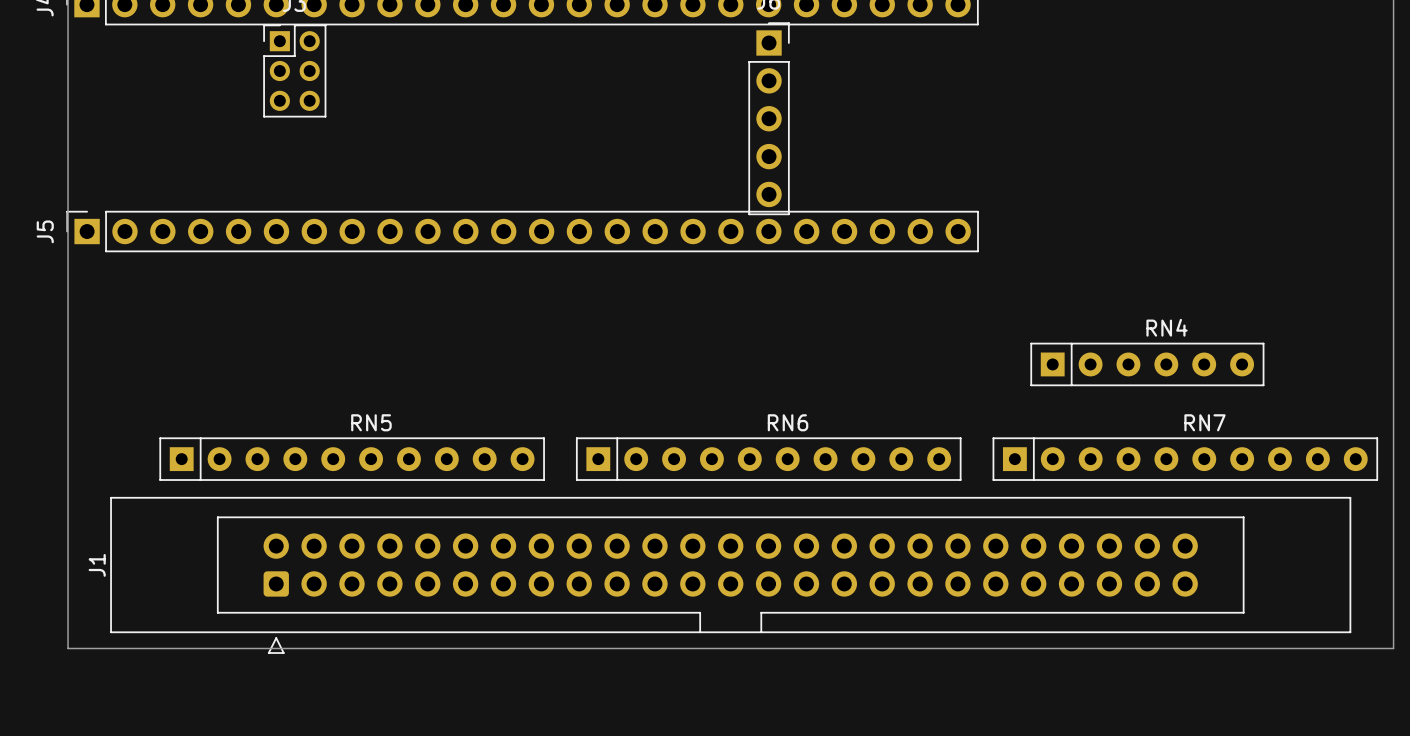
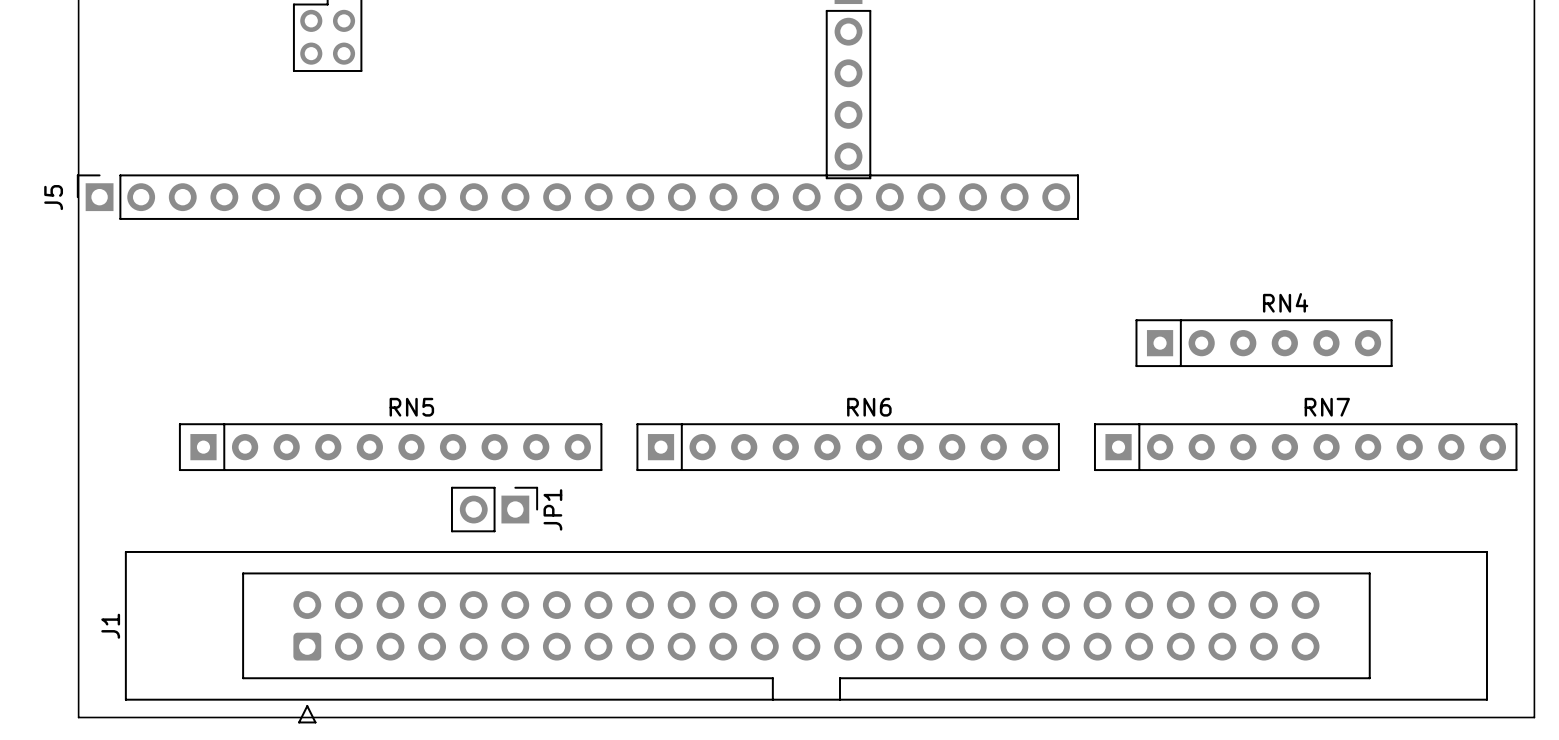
JP1: none -> (494, 509)
J1 position: (730, 575) -> (806, 637)
board edge: (68, 648) (1393, 648) -> (78, 655) (78, 717) (1534, 717) (1534, 655)

